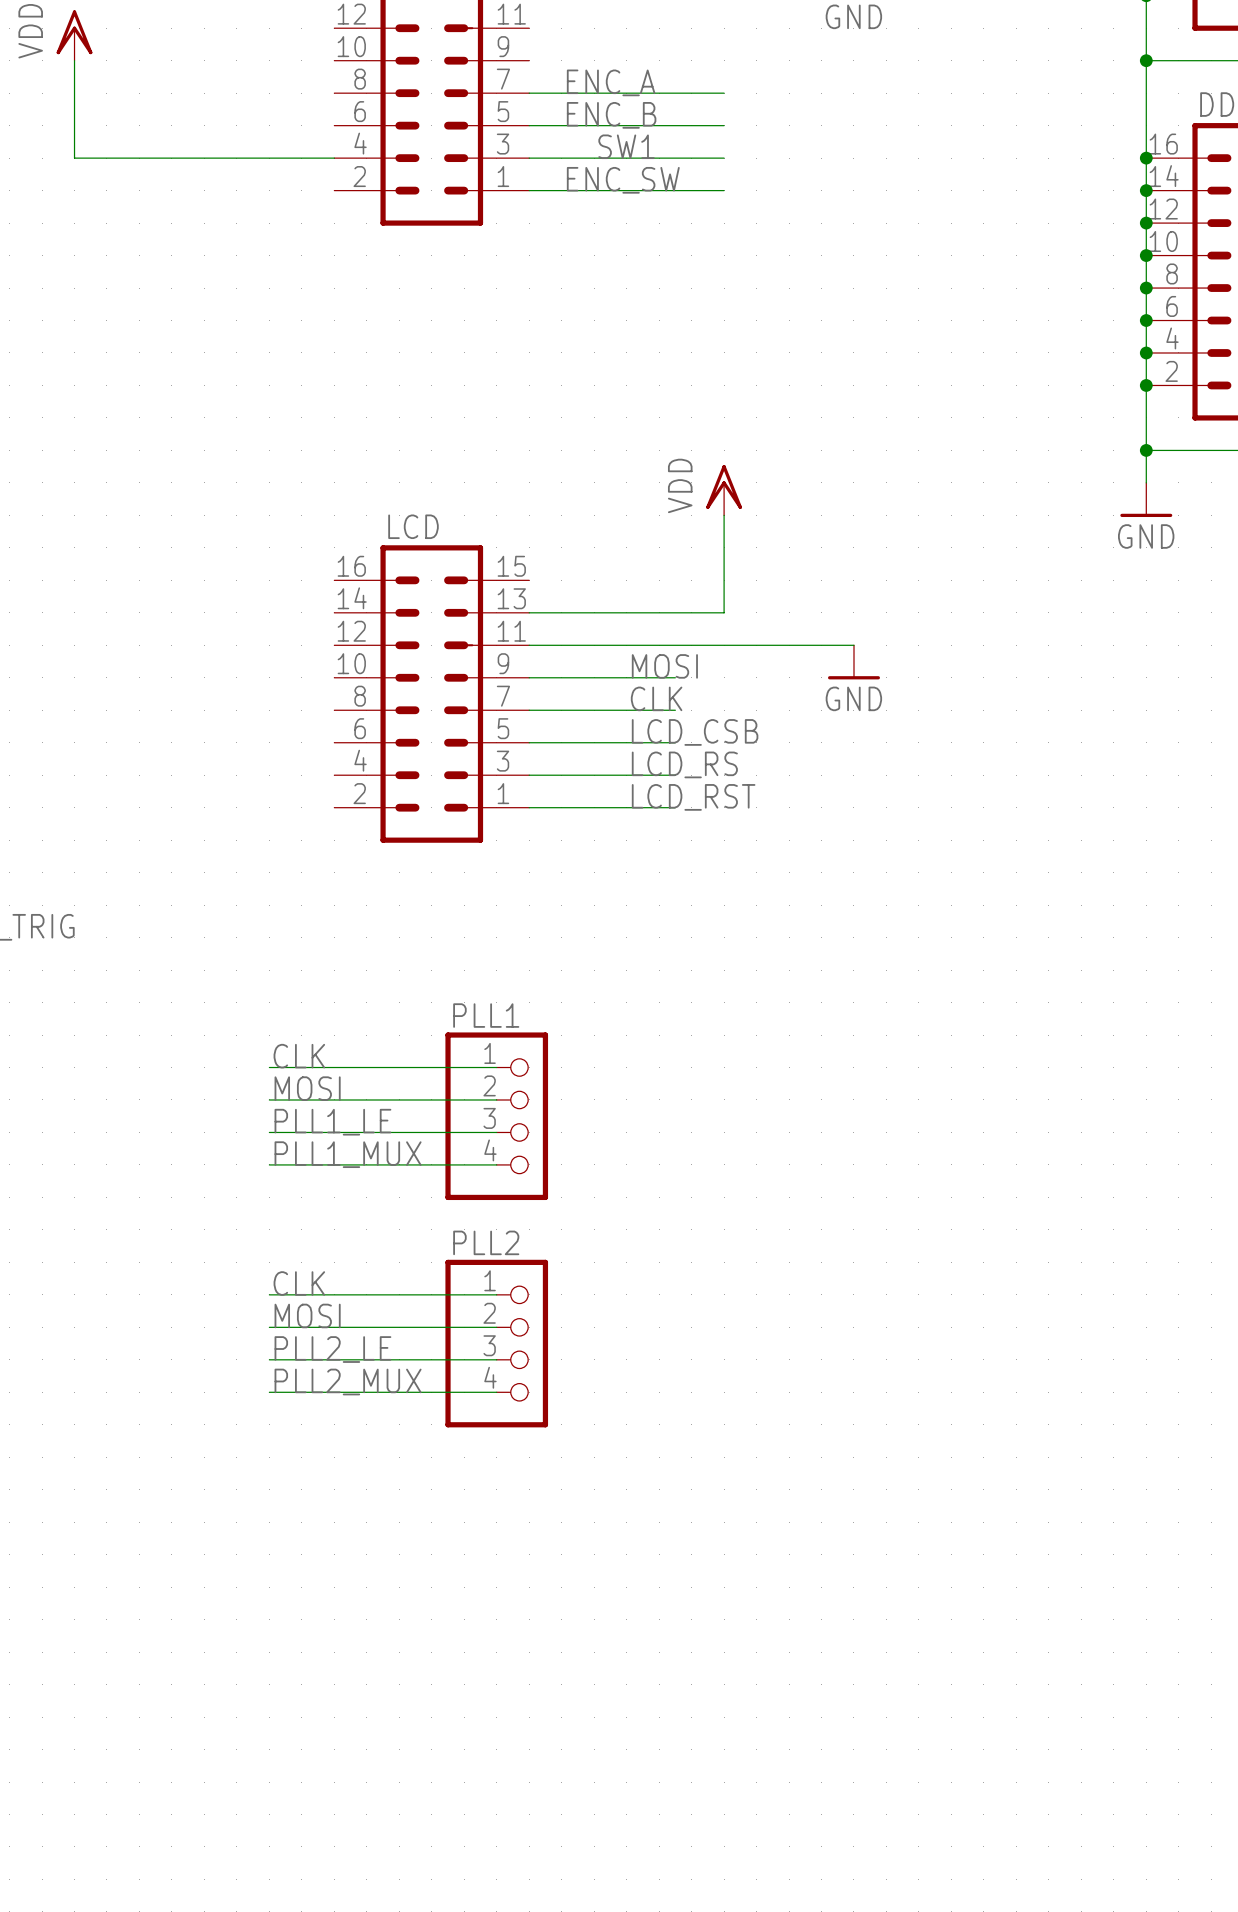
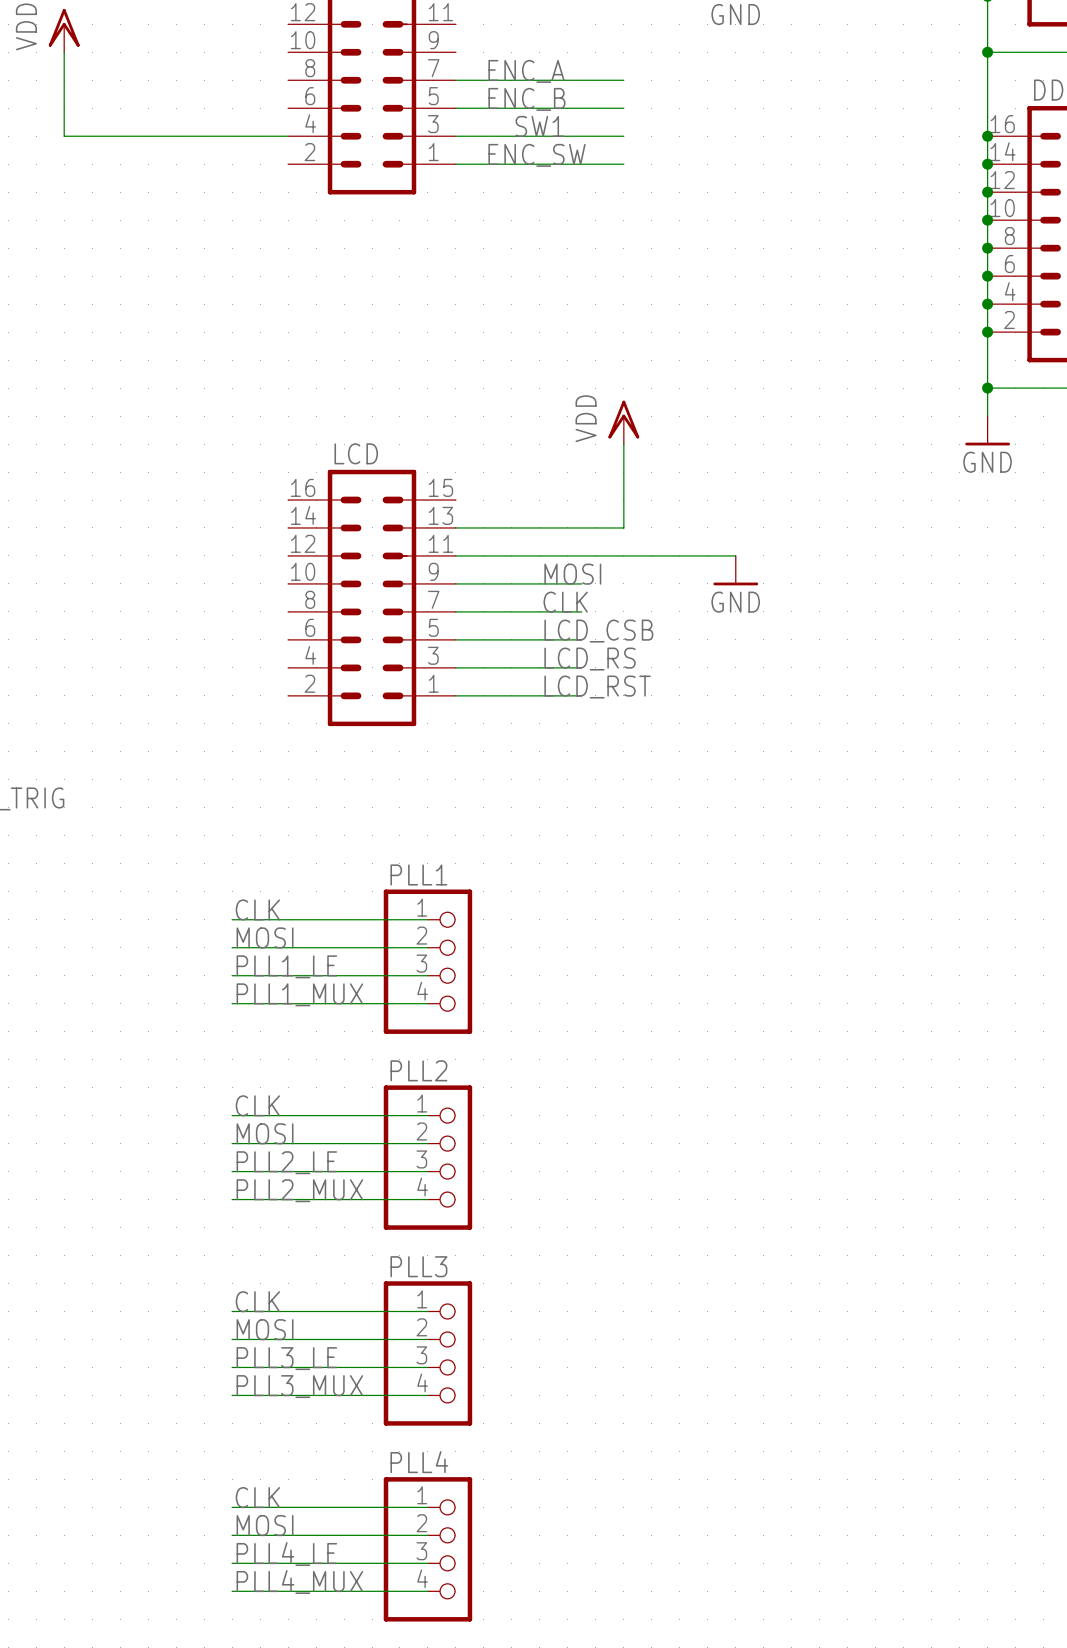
label: none -> CLK (257, 1301)
wire: none -> (232, 1311) (427, 1311)
label: none -> MOSI (265, 1329)
wire: none -> (232, 1339) (427, 1339)
PLL3: none -> (427, 1353)
label: none -> PLL3_LE (286, 1358)
wire: none -> (232, 1367) (427, 1367)
label: none -> PLL3_MUX (299, 1386)
wire: none -> (232, 1395) (427, 1395)
label: none -> CLK (257, 1497)
wire: none -> (232, 1507) (427, 1507)
label: none -> MOSI (265, 1525)
wire: none -> (232, 1535) (427, 1535)
PLL4: none -> (427, 1549)
label: none -> PLL4_LE (286, 1554)
wire: none -> (232, 1563) (427, 1563)
label: none -> PLL4_MUX (299, 1581)
wire: none -> (232, 1591) (427, 1591)

